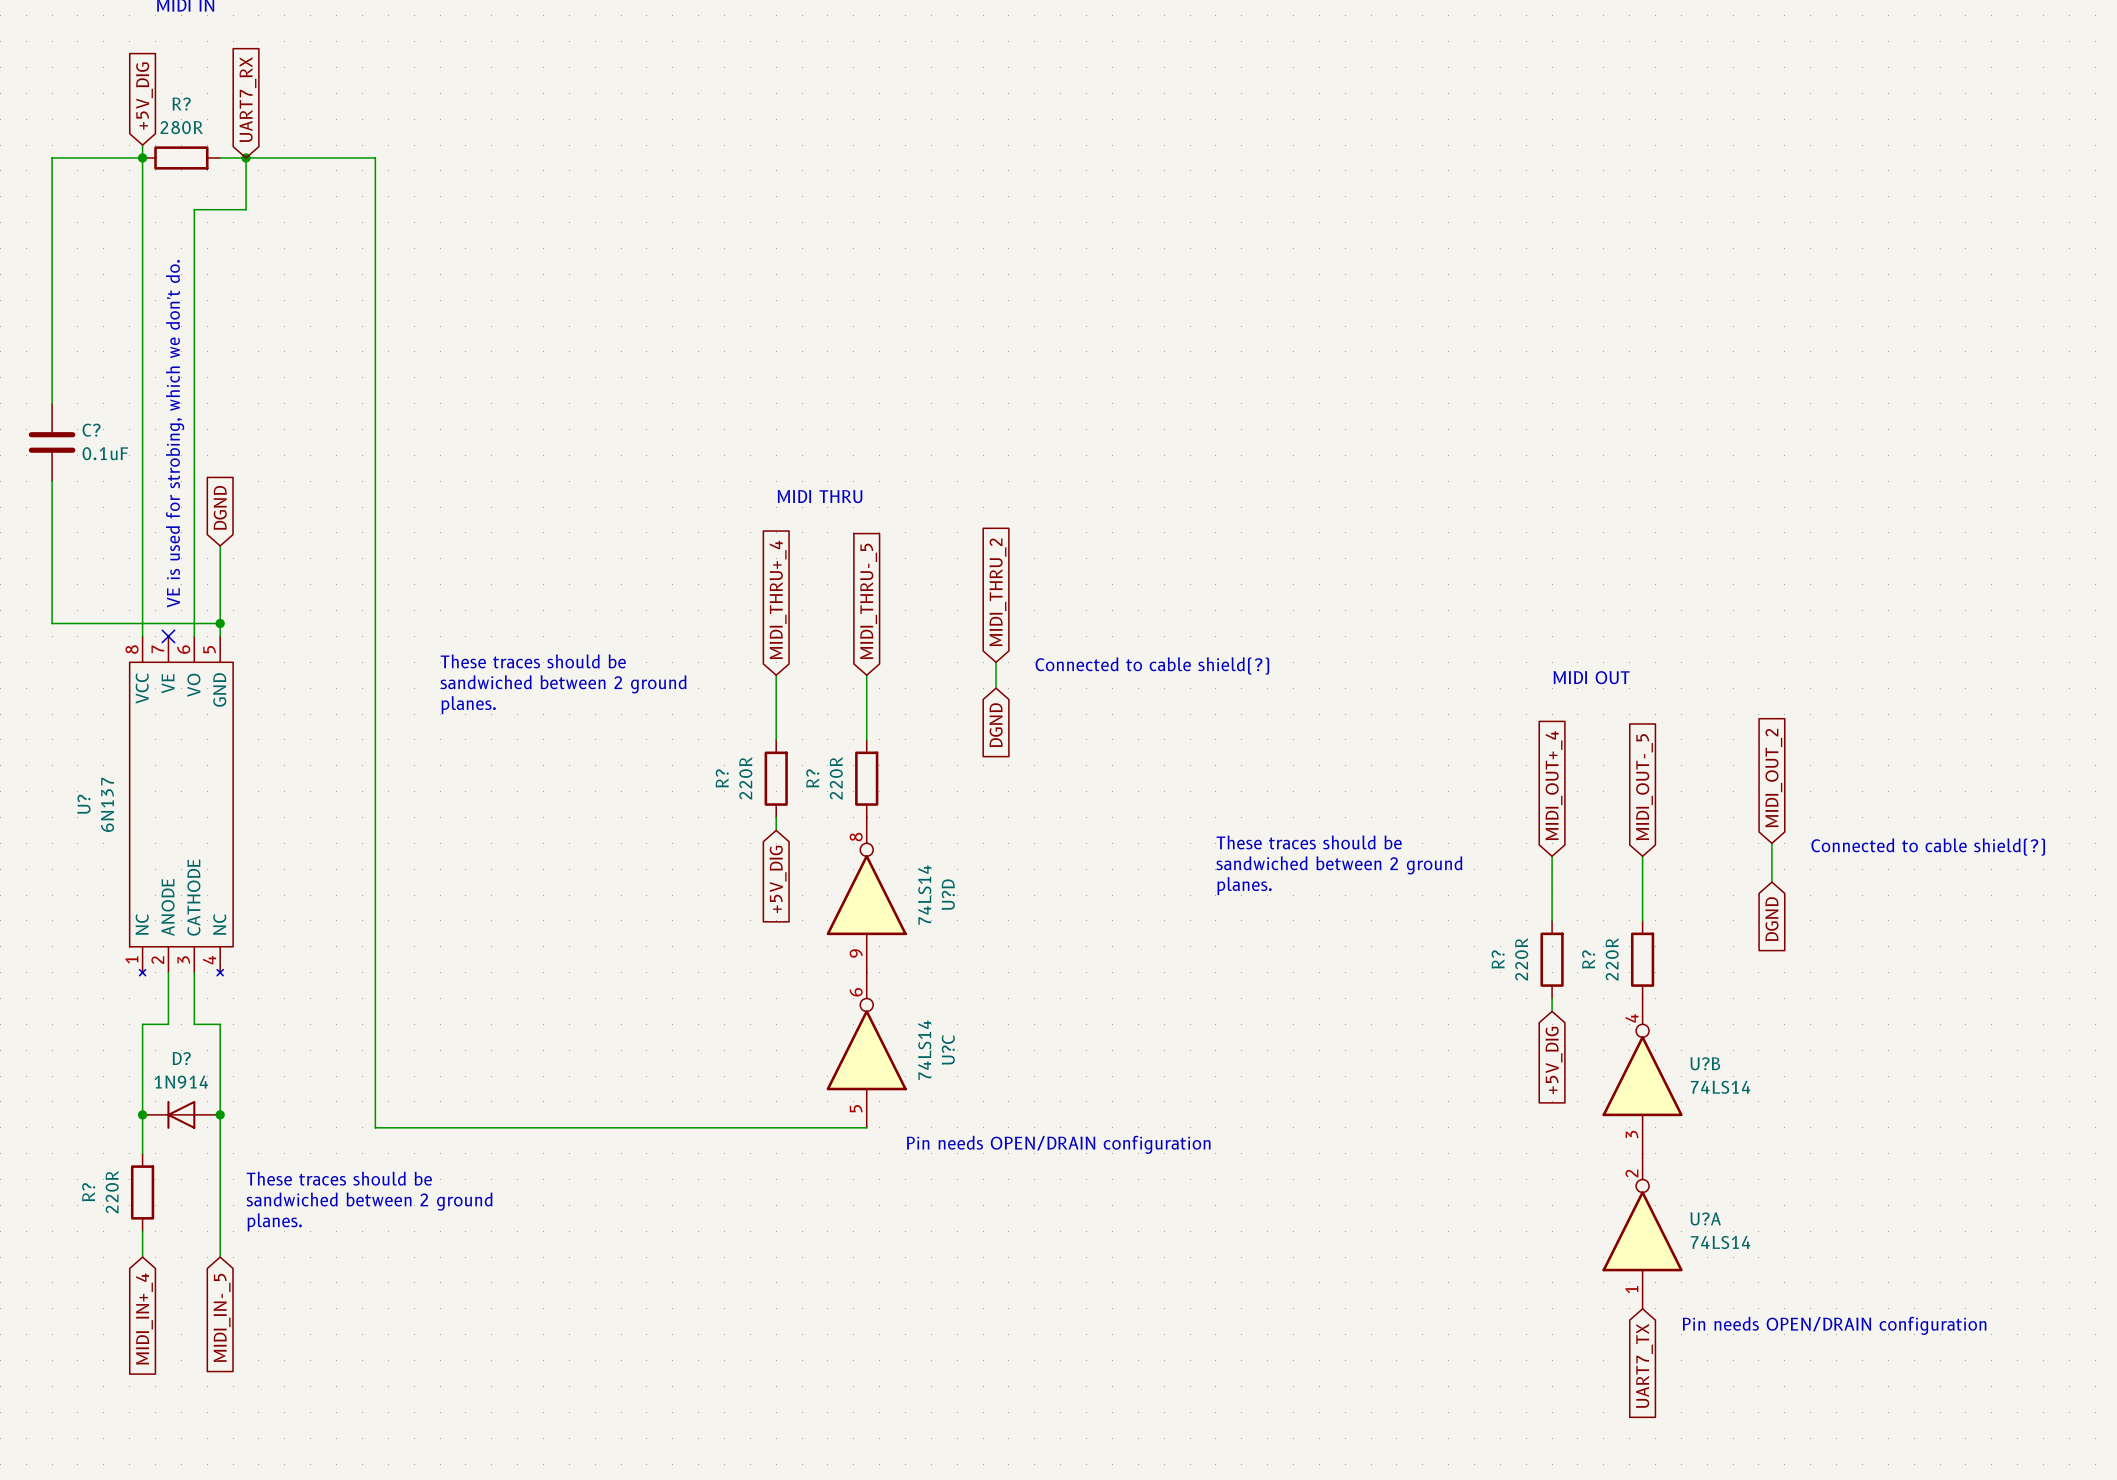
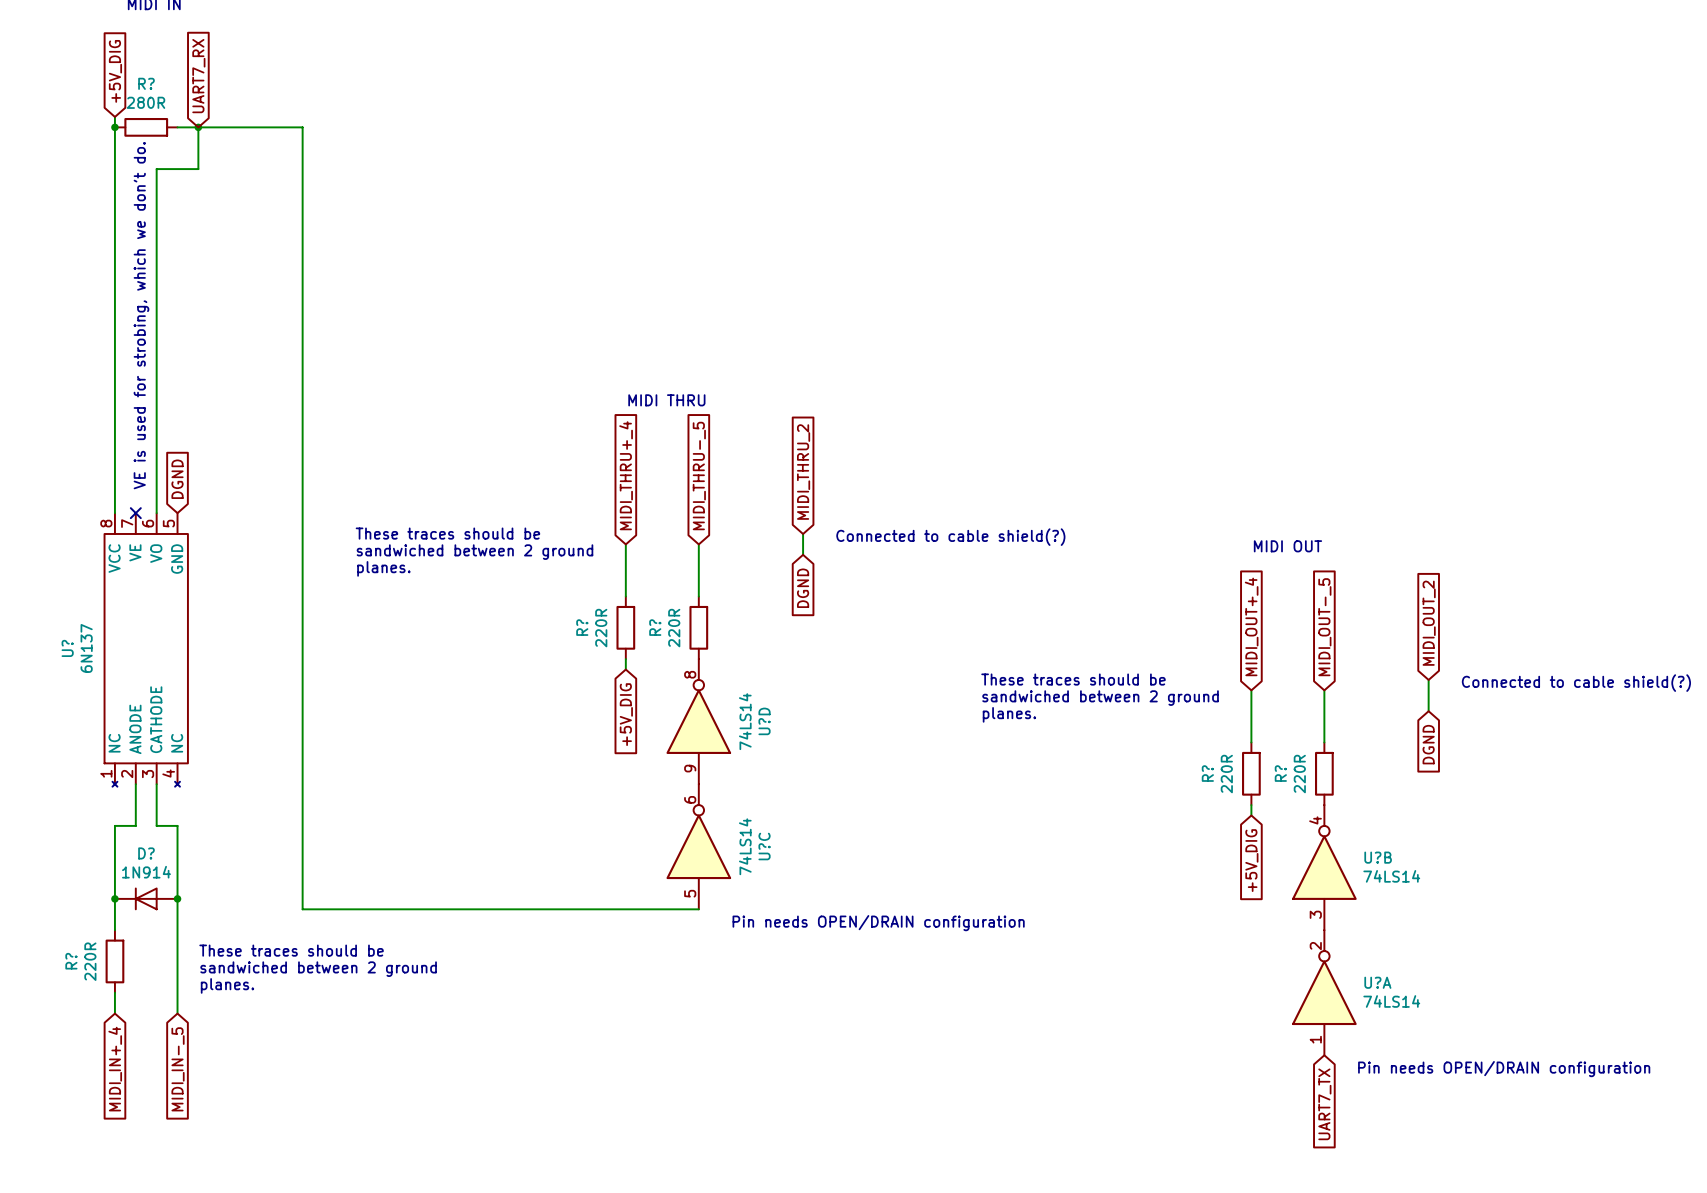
wire: (142, 157) (52, 157) (52, 403) -> none
C?: 0.1uF (52, 442) -> none
wire: (52, 481) (52, 623) (220, 623) -> none
global label position: DGND (220, 507) -> DGND (177, 479)
wire: (220, 545) (220, 636) -> none
junction: (220, 623) -> none

